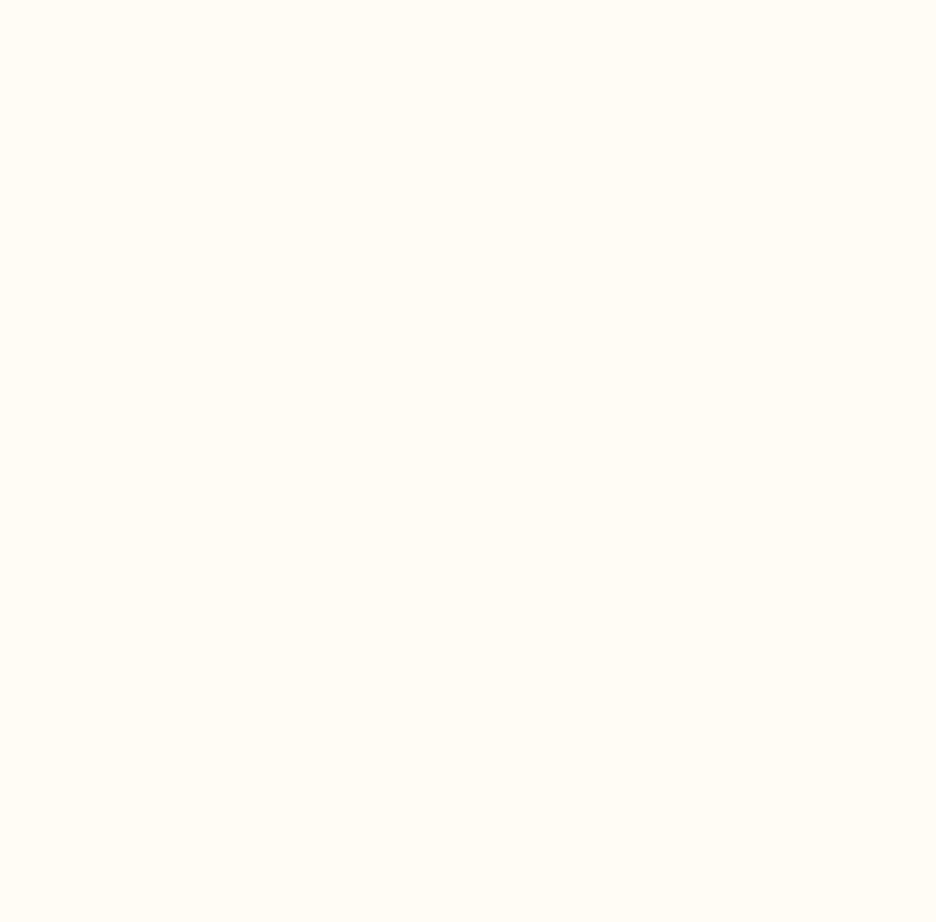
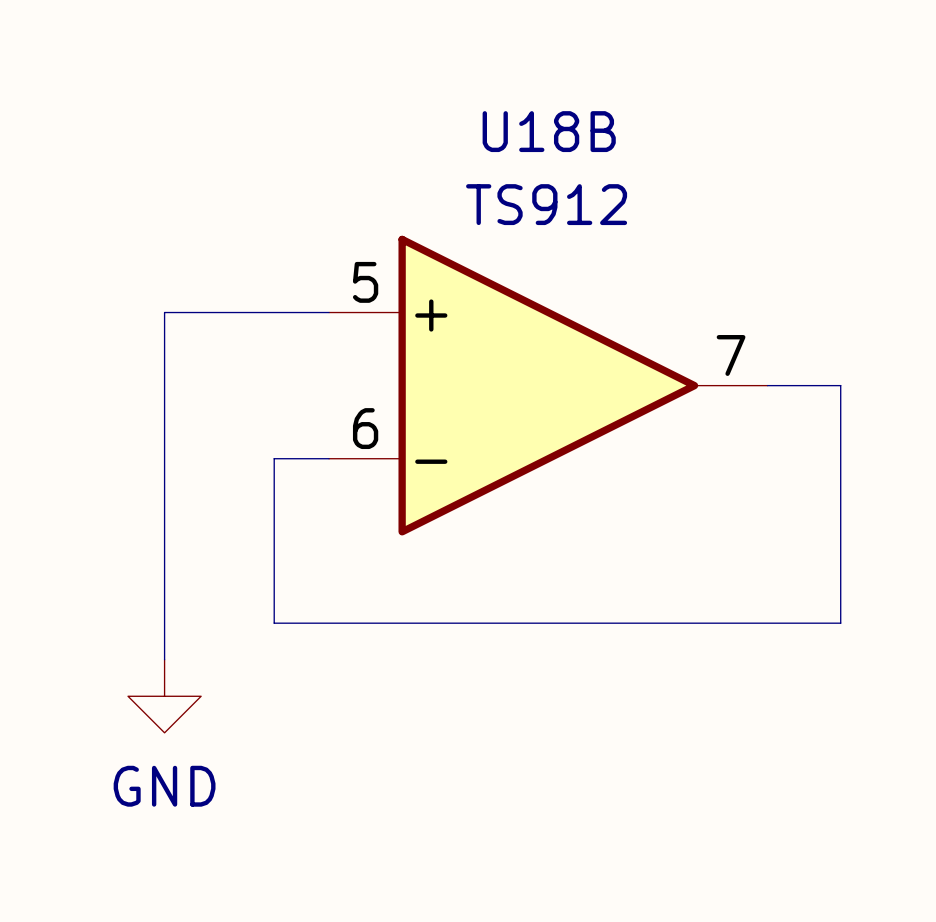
wire: none -> (329, 312) (164, 312) (164, 659)
U18B: none -> TS912 (548, 385)
wire: none -> (767, 385) (840, 385) (840, 623) (274, 623) (274, 458) (329, 458)
power symbol: none -> GND (164, 696)

